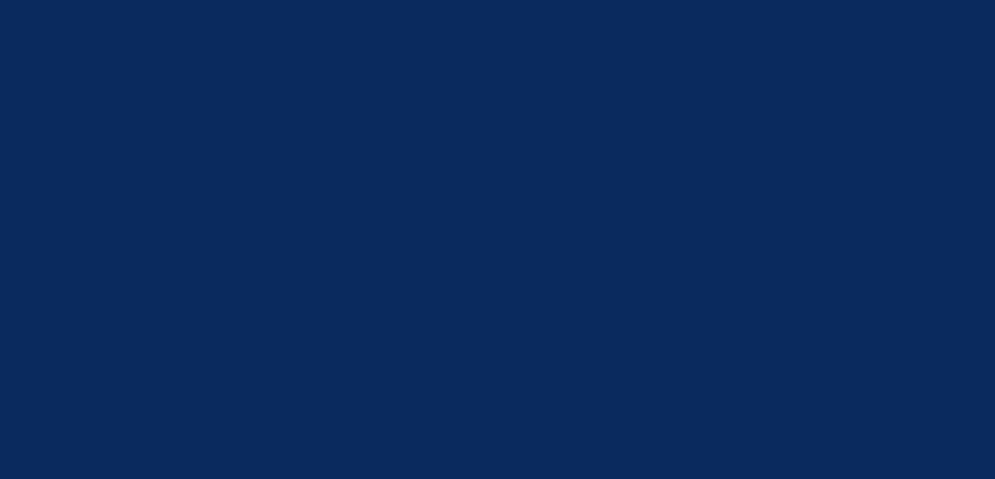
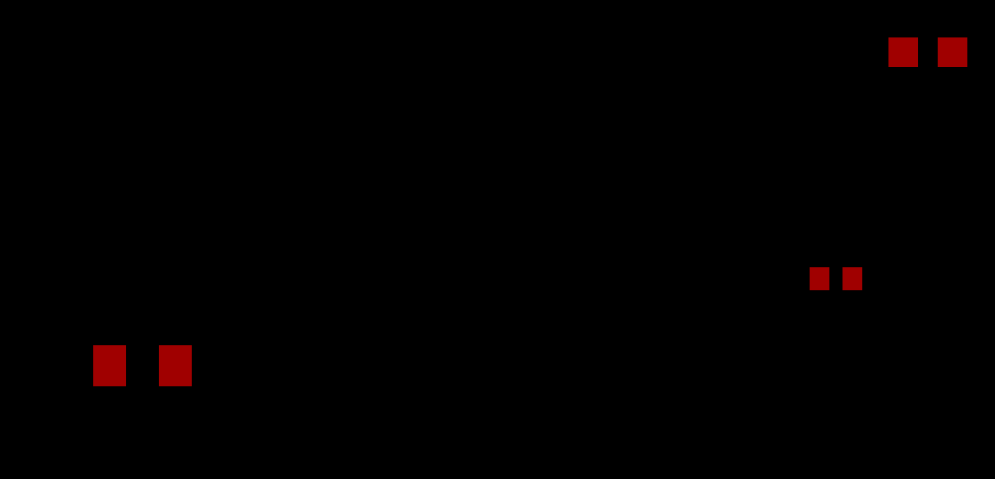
part: none -> (927, 52)
part: none -> (835, 278)
part: none -> (142, 365)

